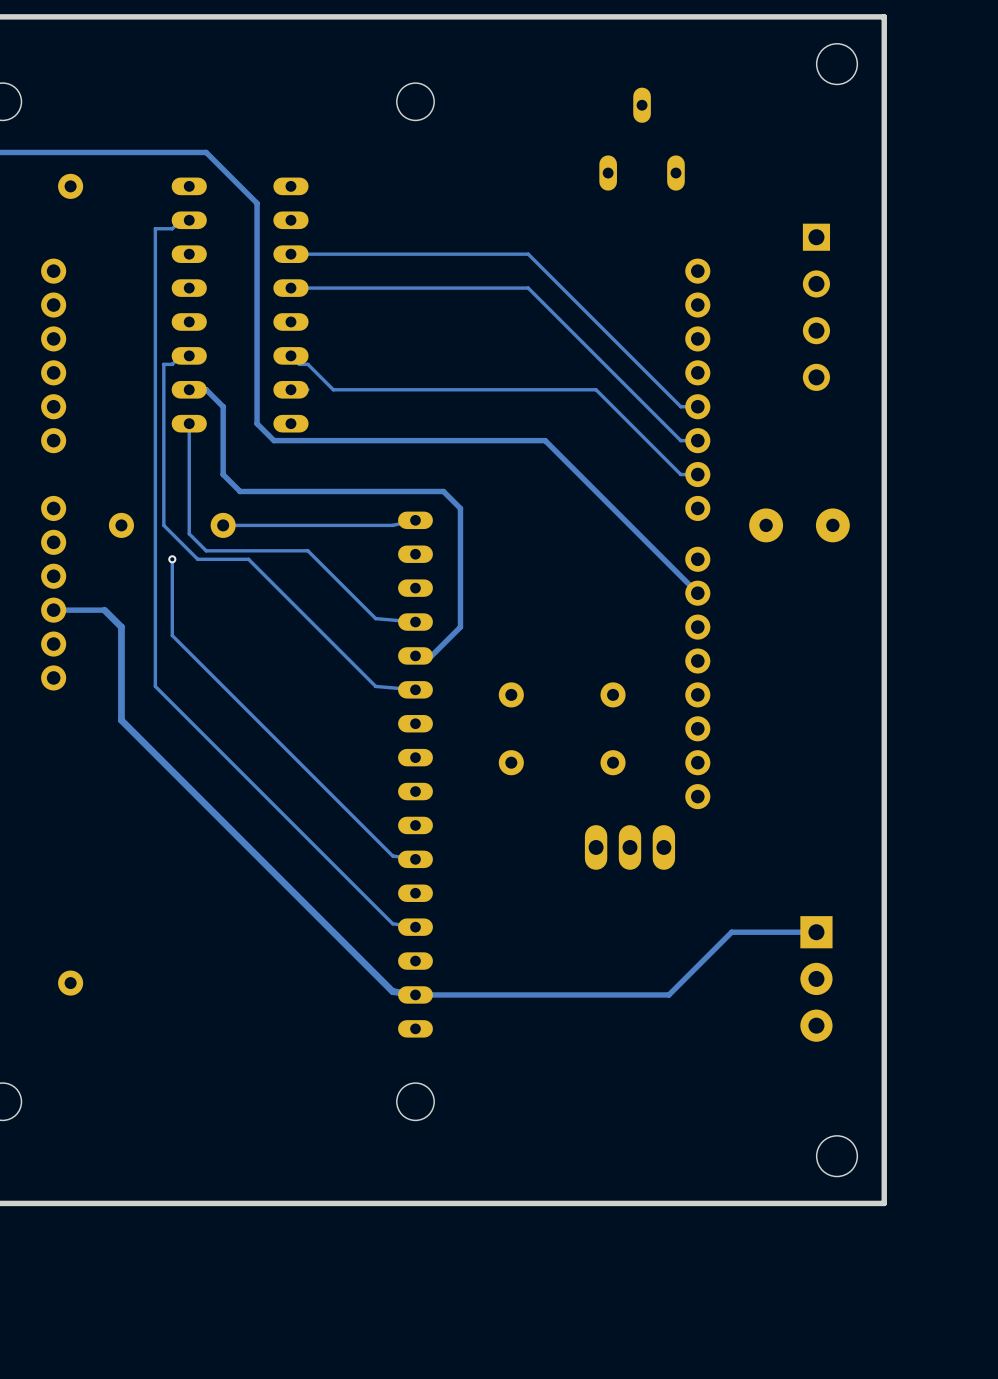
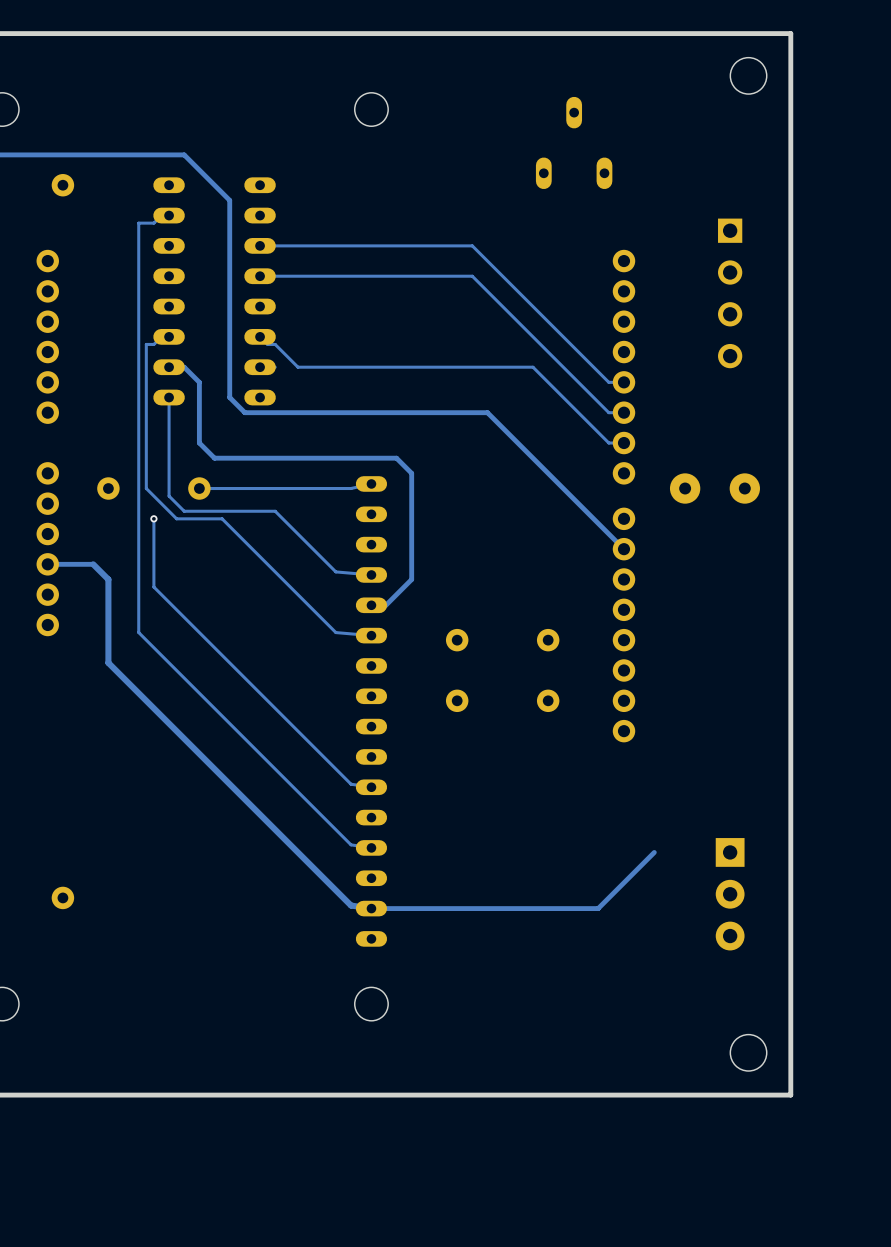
part: (629, 847) -> none
track: (816, 932) (731, 932) -> none

